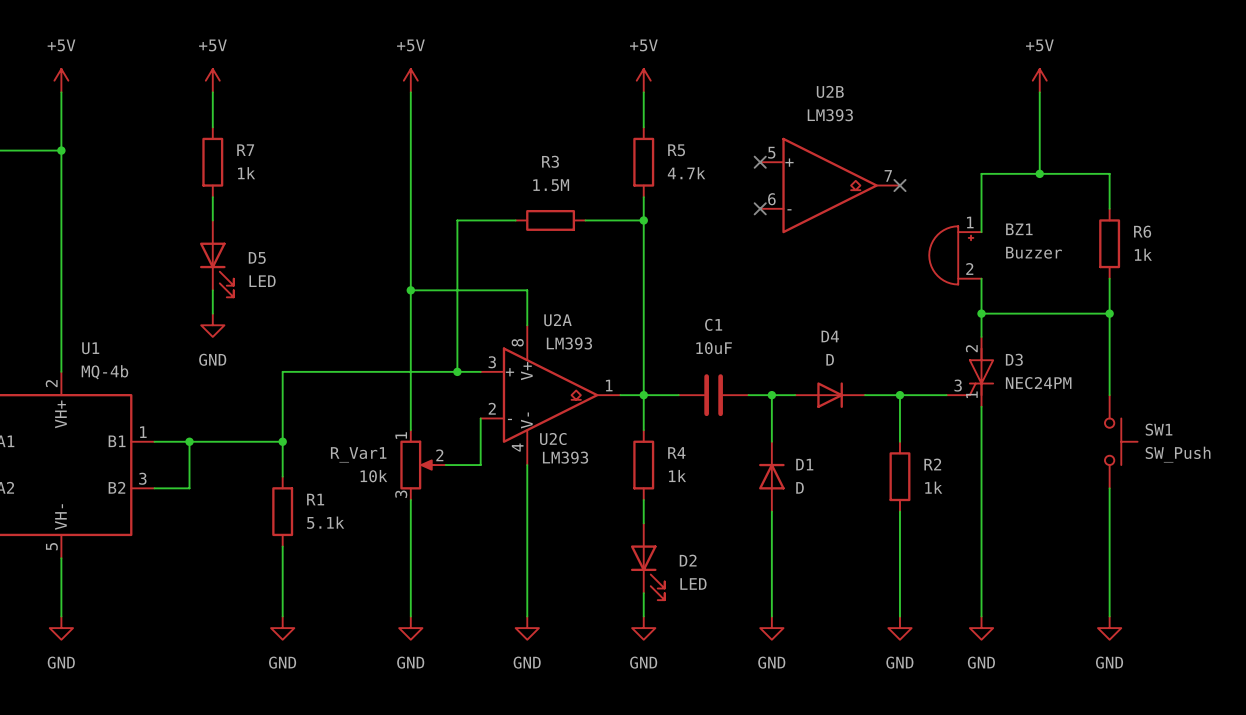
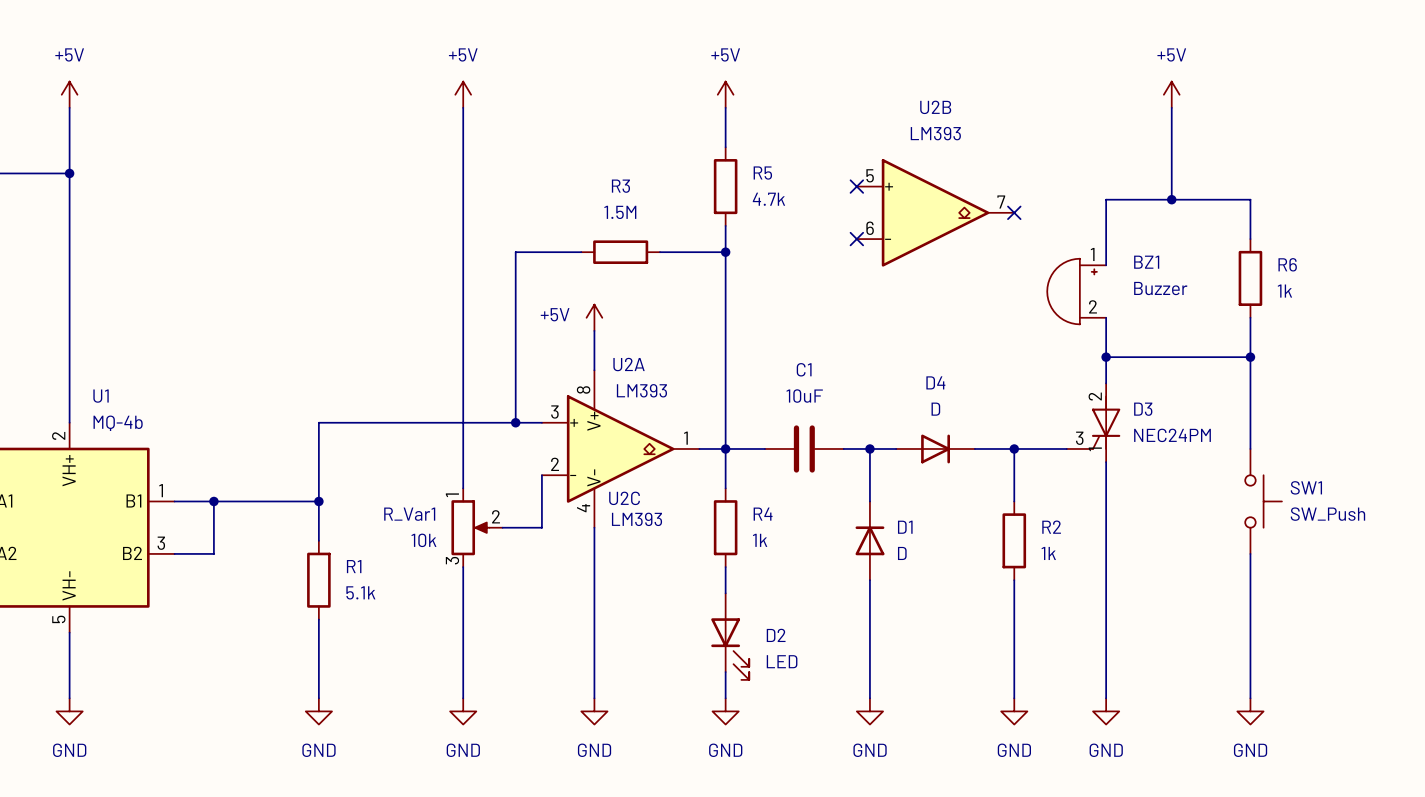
power symbol: +5V (212, 80) -> none
wire: (212, 92) (212, 127) -> none
R7: 1k (212, 162) -> none
wire: (212, 197) (212, 220) -> none
D5: LED (216, 258) -> none
power symbol: none -> +5V (594, 317)
wire: (212, 290) (212, 313) -> none
wire: (410, 290) (527, 290) -> none
junction: (410, 290) -> none
power symbol: GND (212, 325) -> none

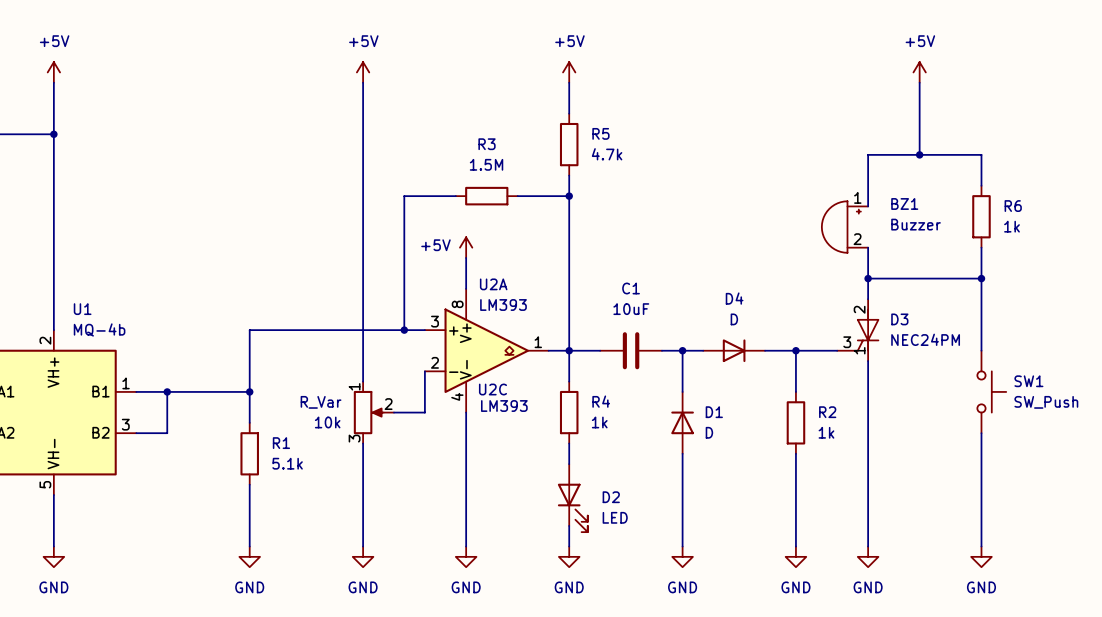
no-connect mark: (856, 186) -> none
U2B: LM393 (935, 212) -> none
no-connect mark: (1014, 212) -> none
no-connect mark: (856, 239) -> none
R_Var1 name: R_Var1 (409, 514) -> R_Var (321, 402)

